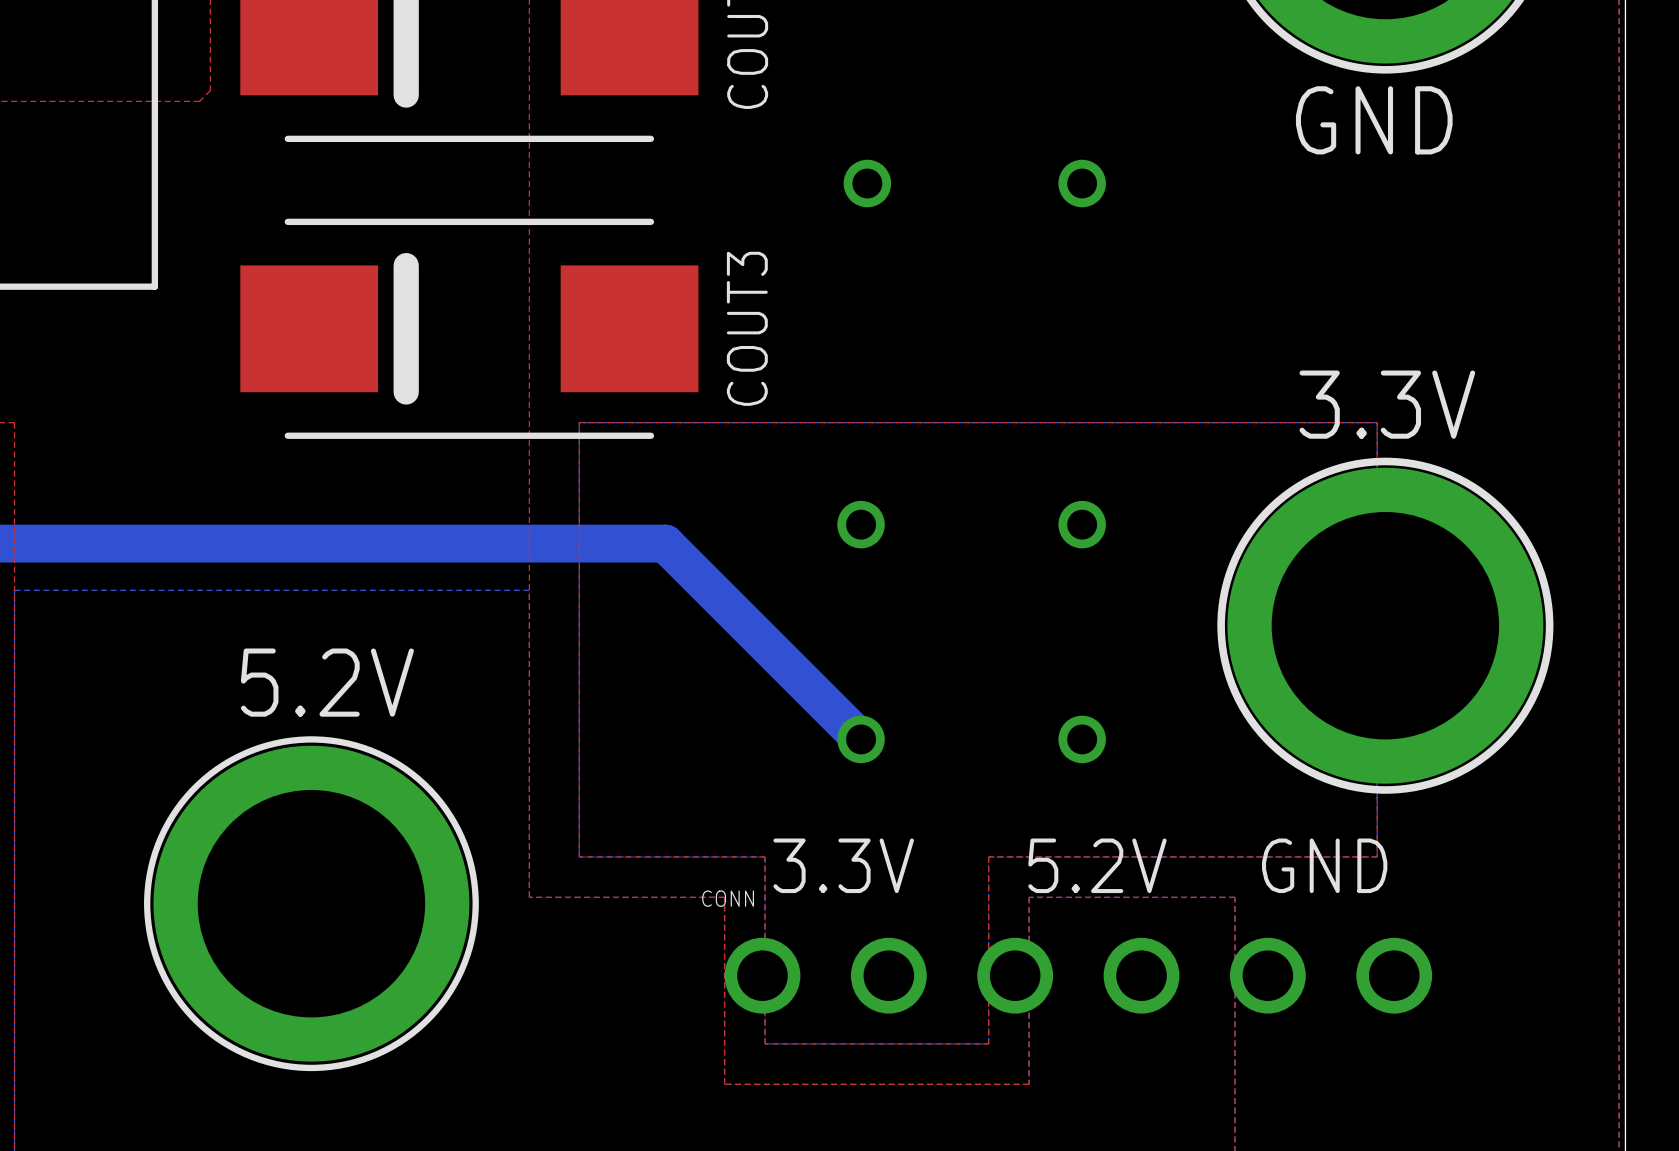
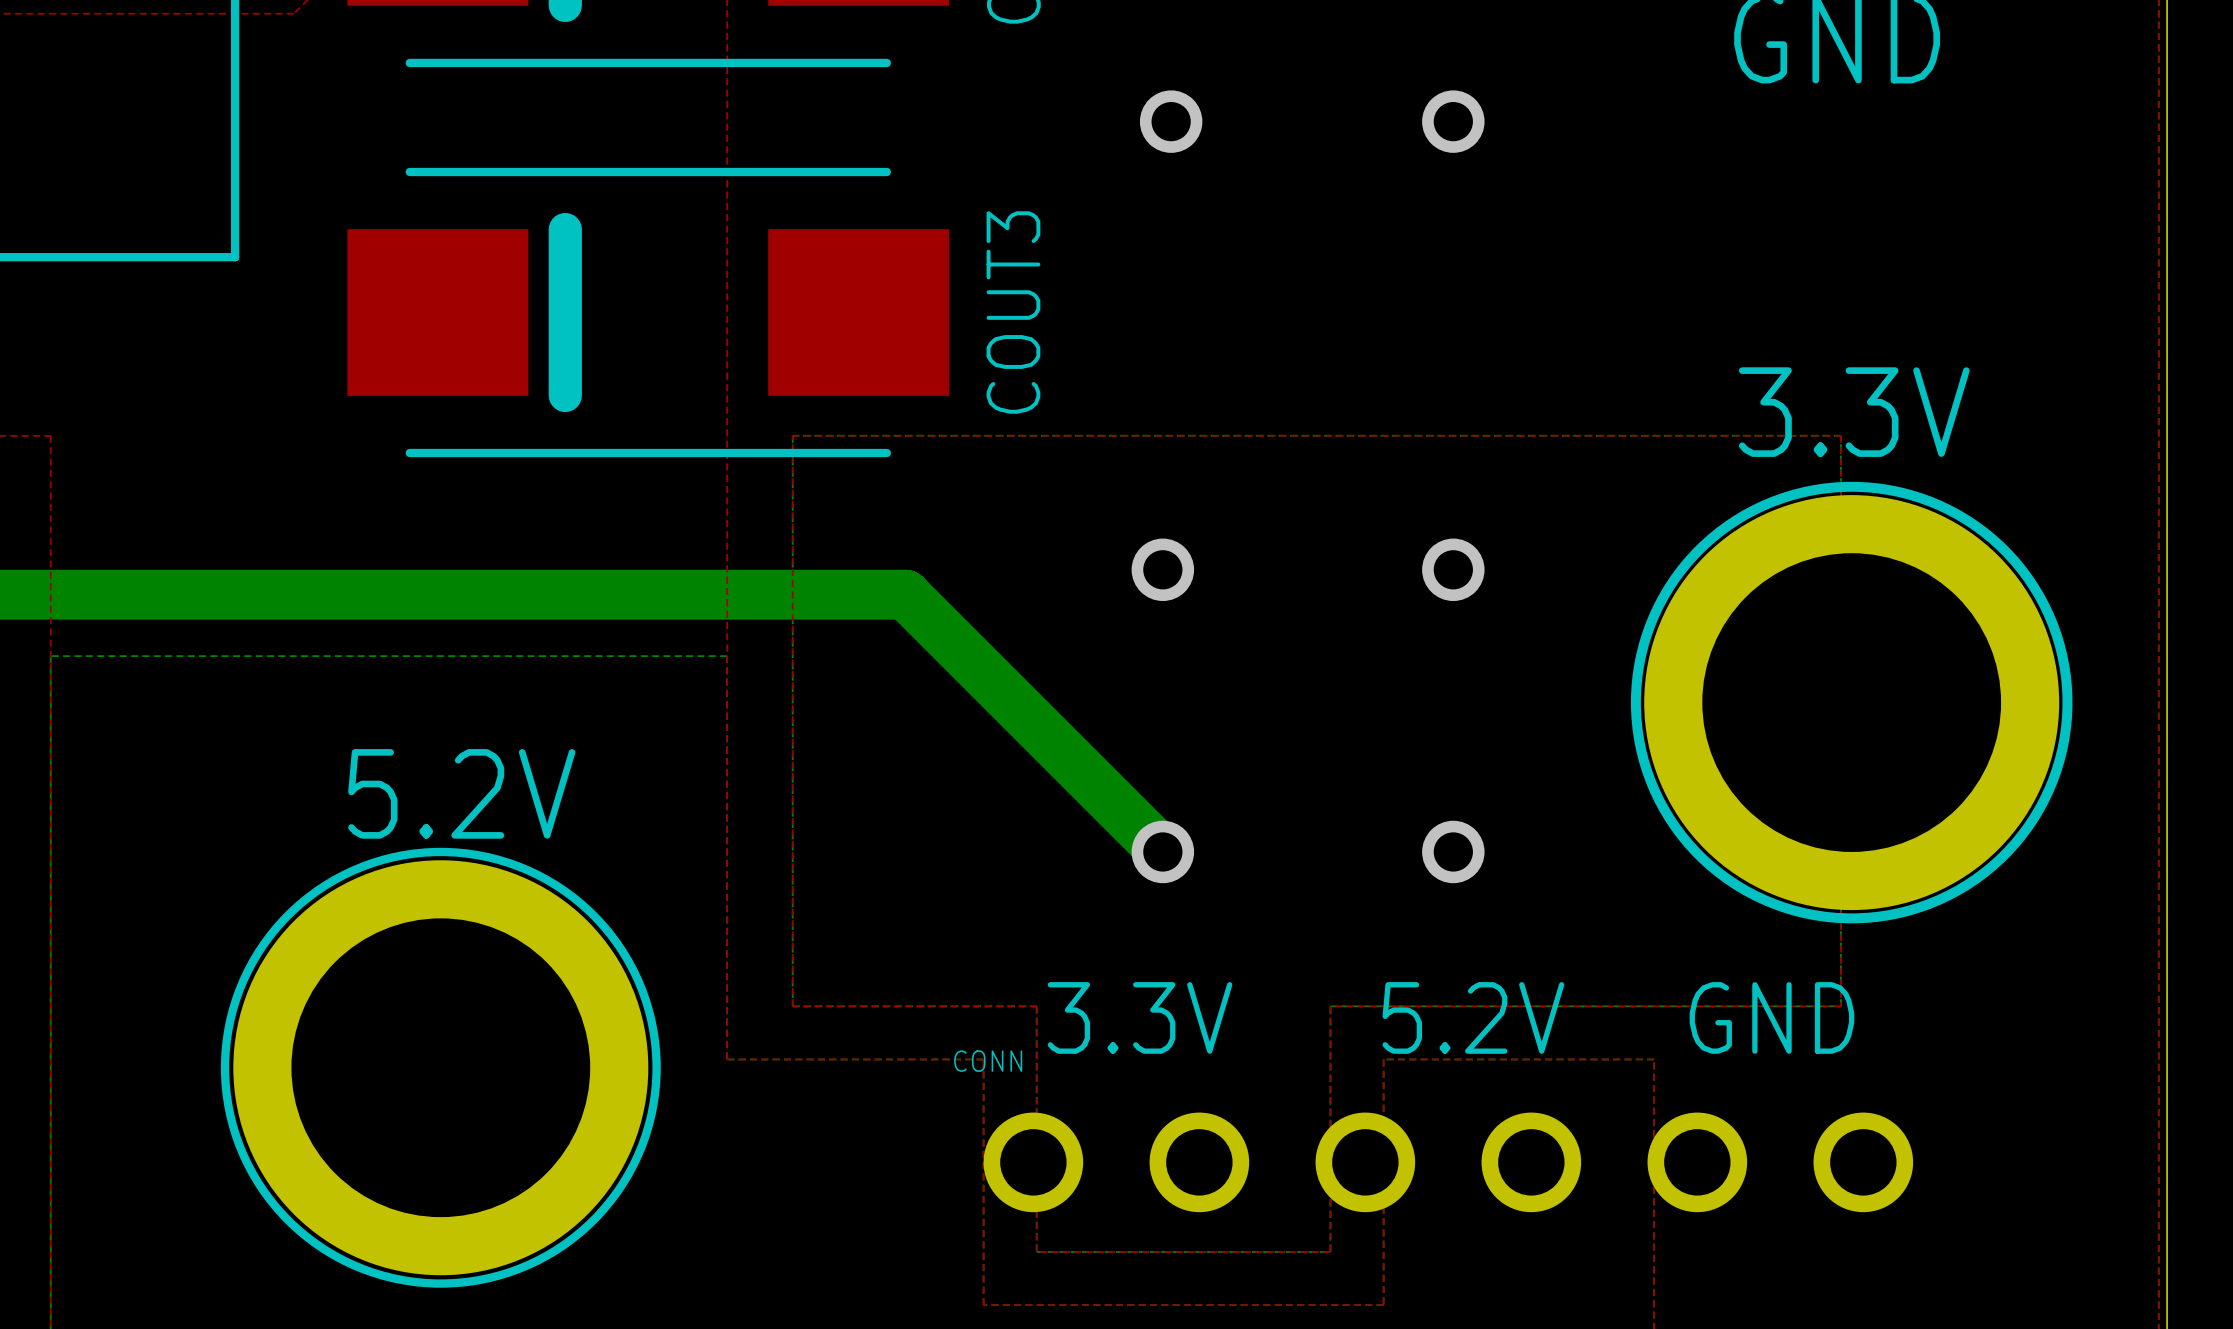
text position: 5.2V (327, 682) -> 5.2V (461, 793)

